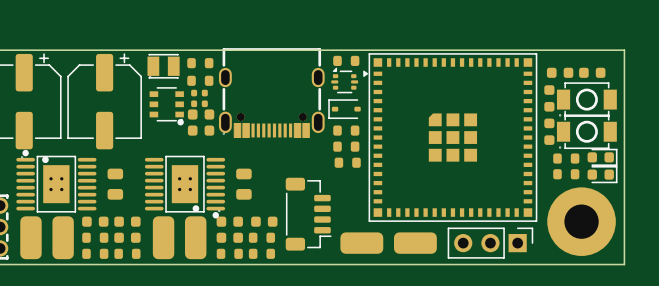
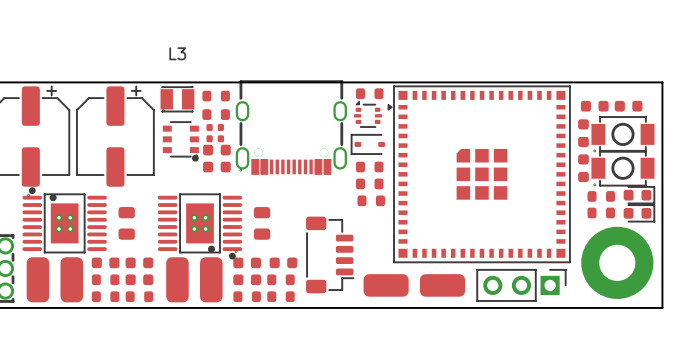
L3 name: none -> L3 (177, 53)

